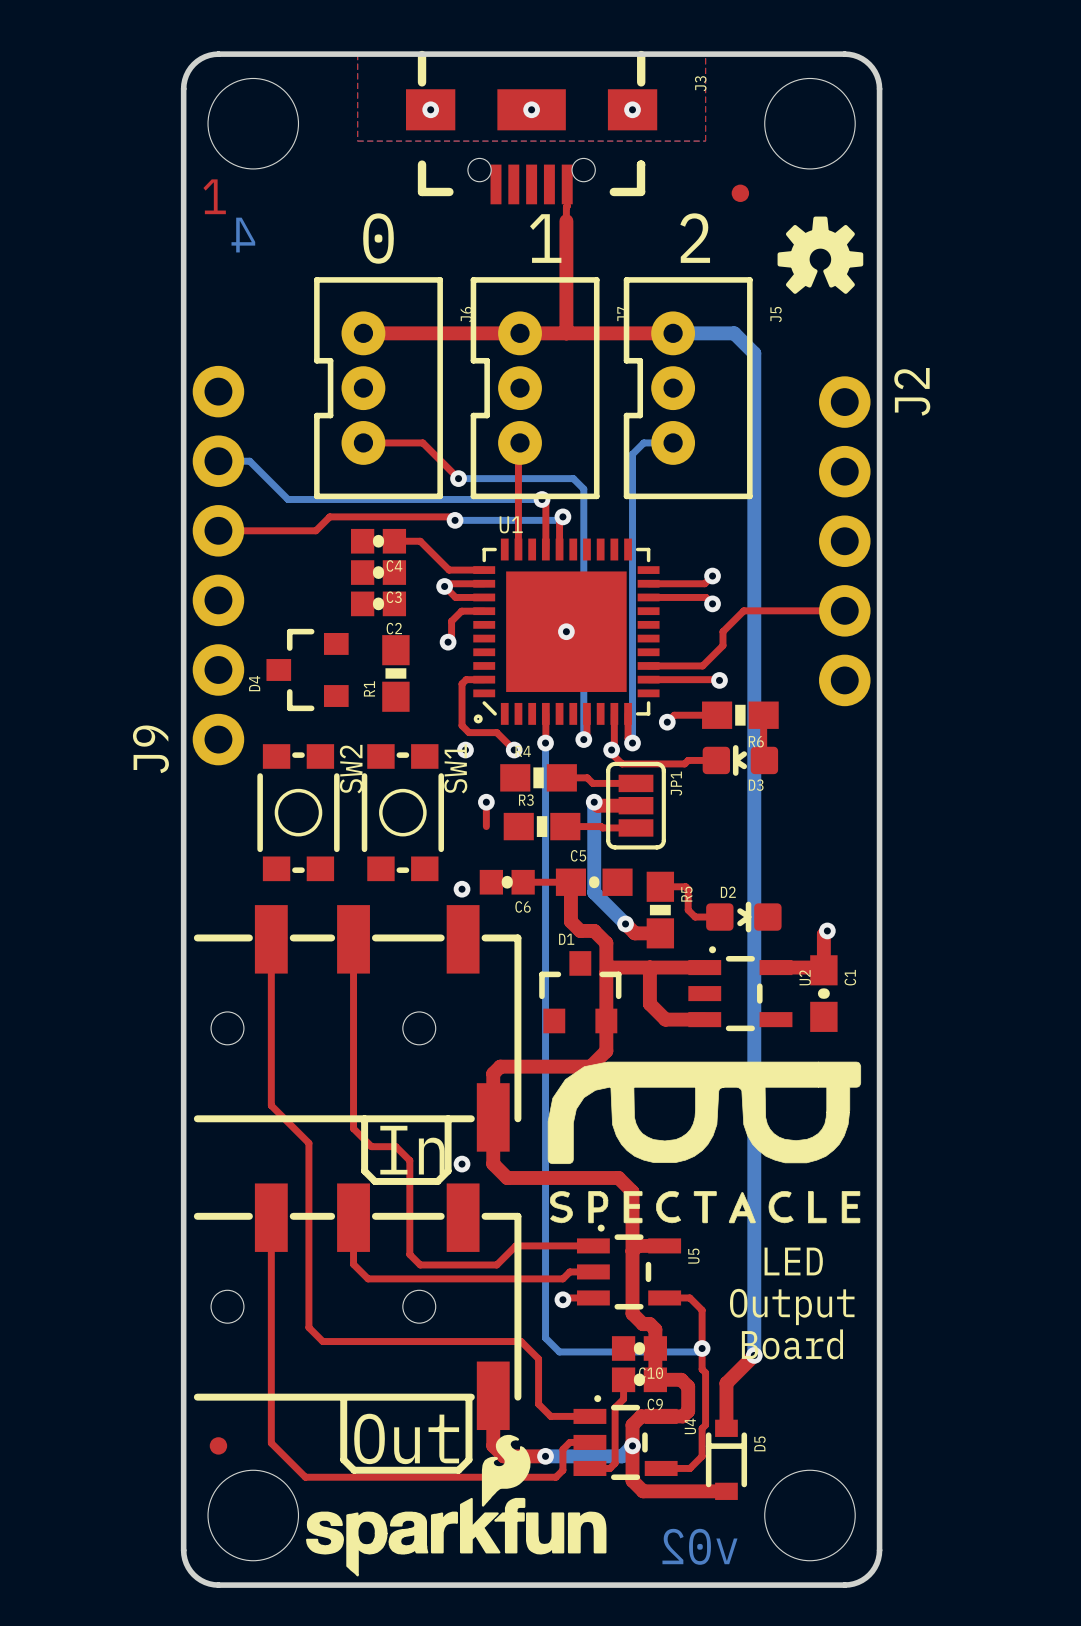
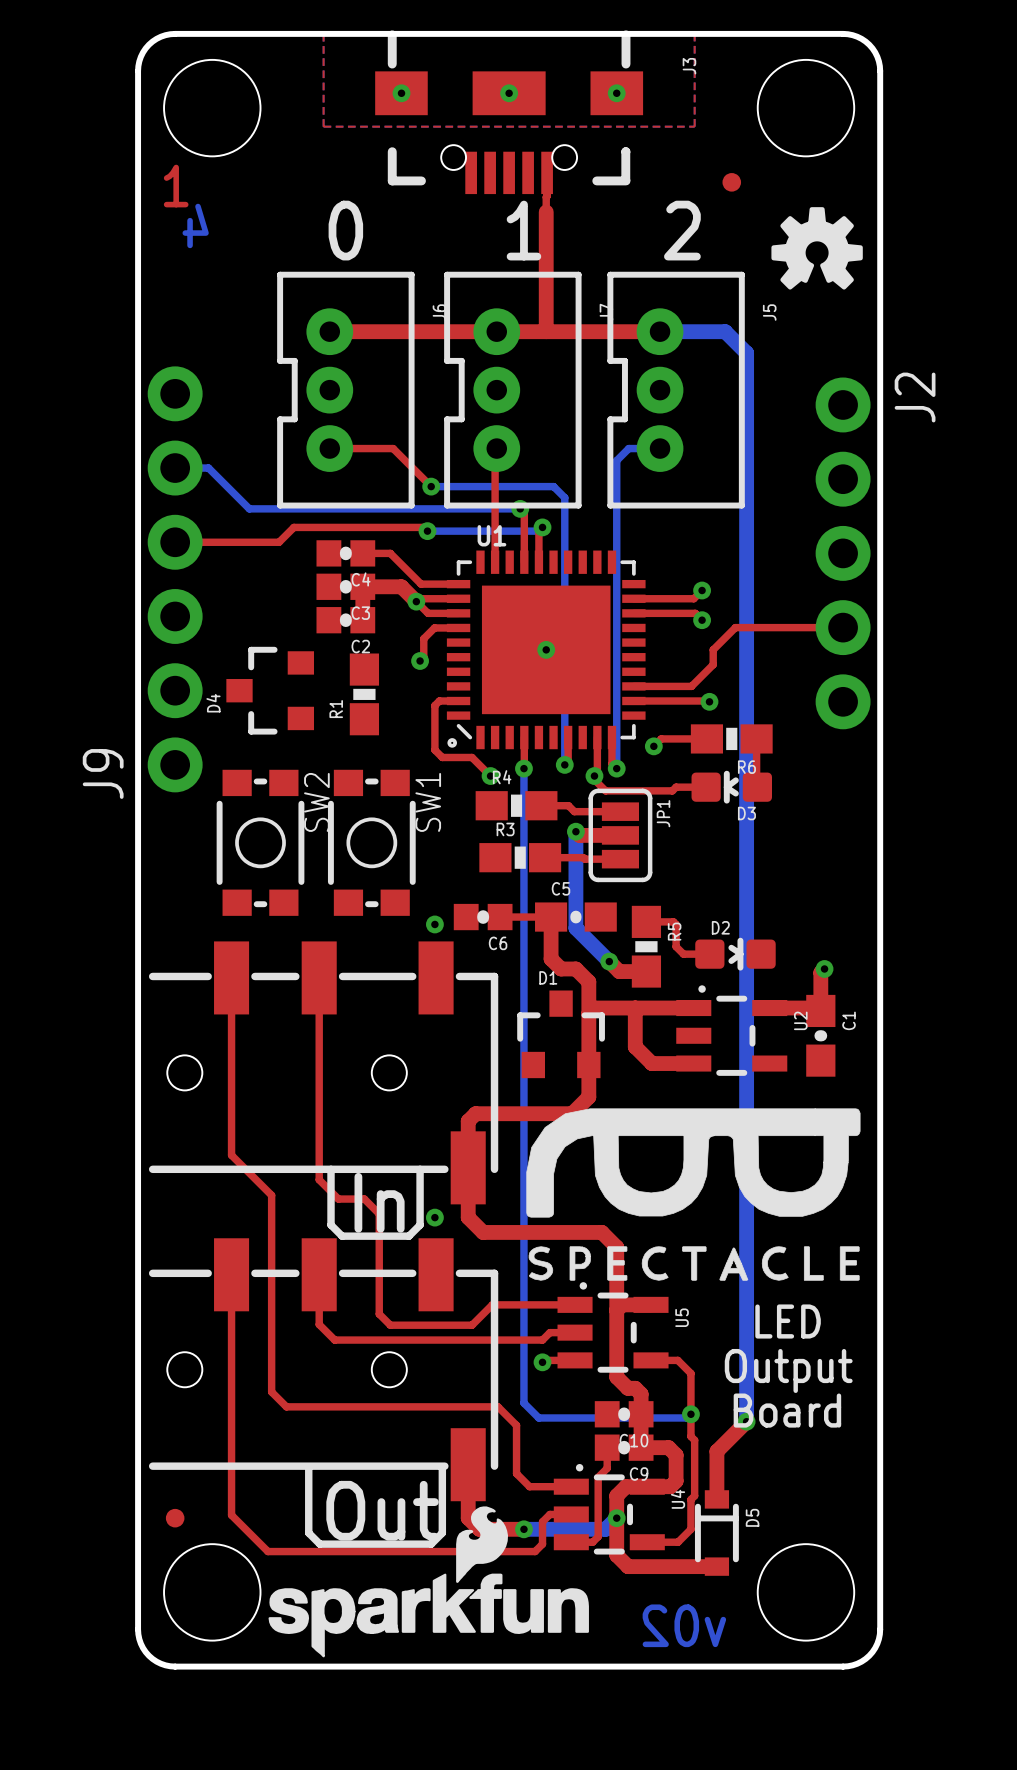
top track: none -> (416, 601) (401, 586) (362, 586) (362, 620)
via: (465, 750) -> none
top track: (486, 802) (486, 826) -> none
via: (486, 802) -> none

